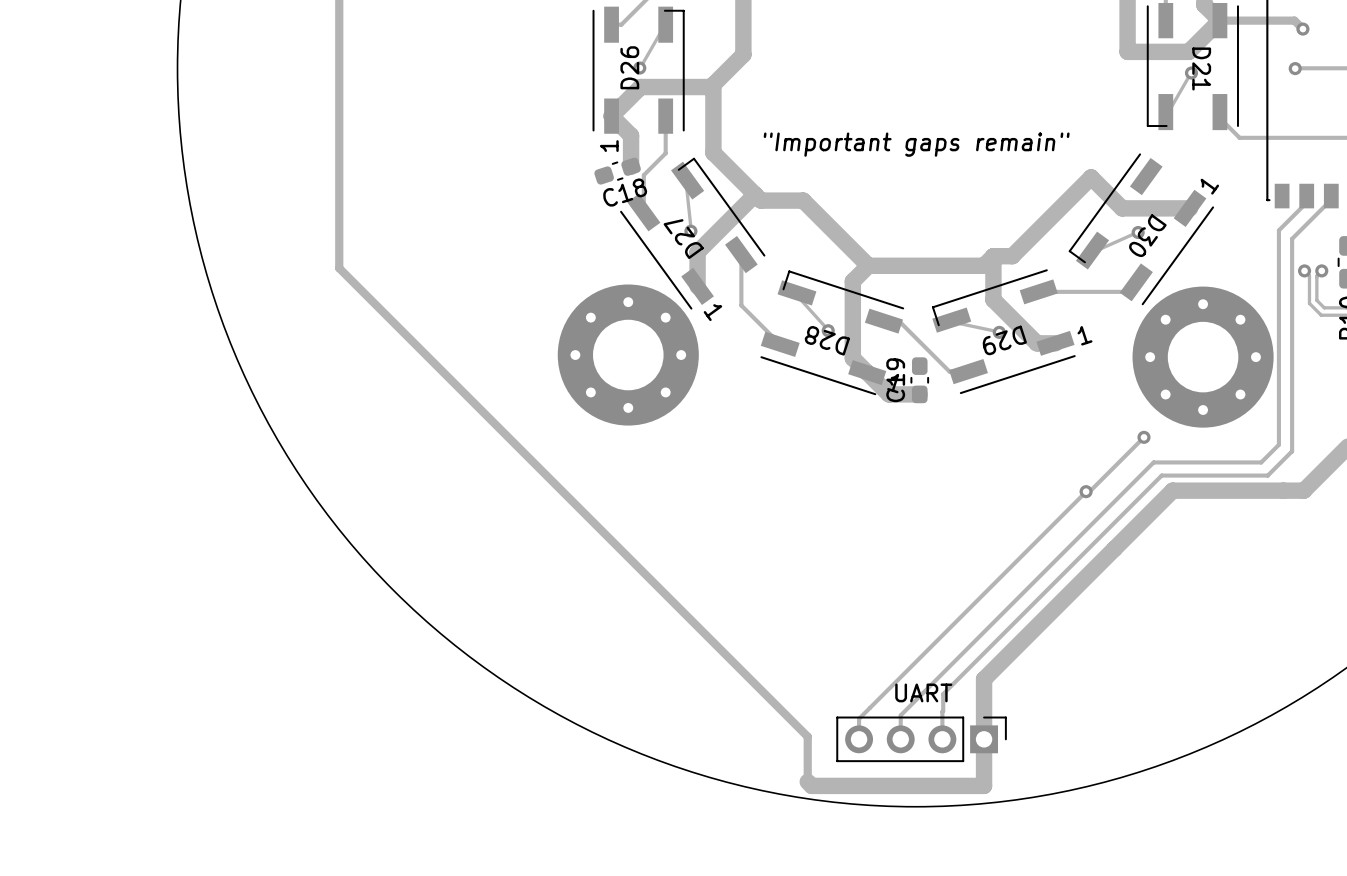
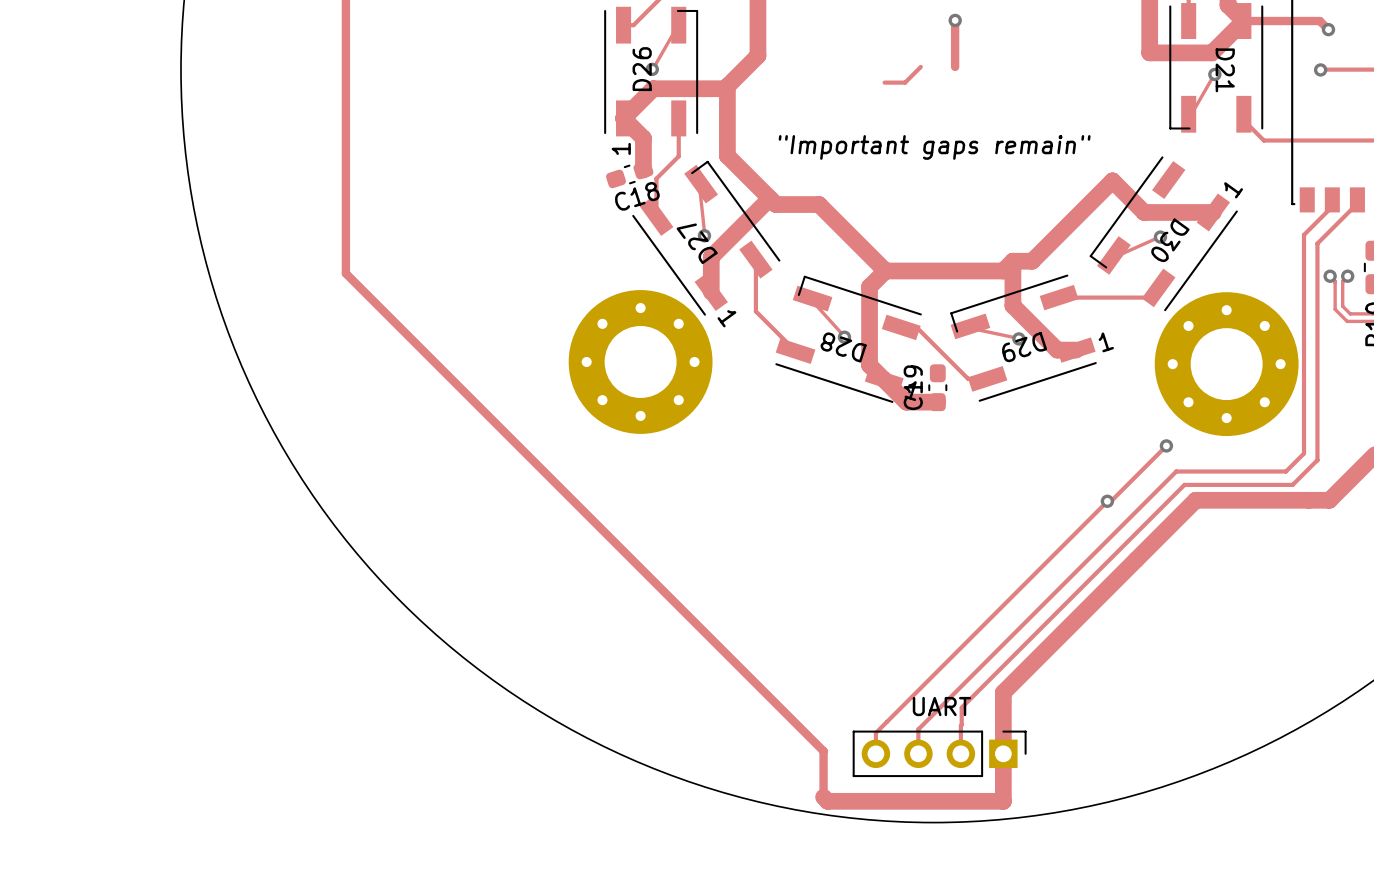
track: none -> (955, 20) (955, 66)
via: none -> (955, 20)
track: none -> (920, 66) (905, 82) (884, 82)

